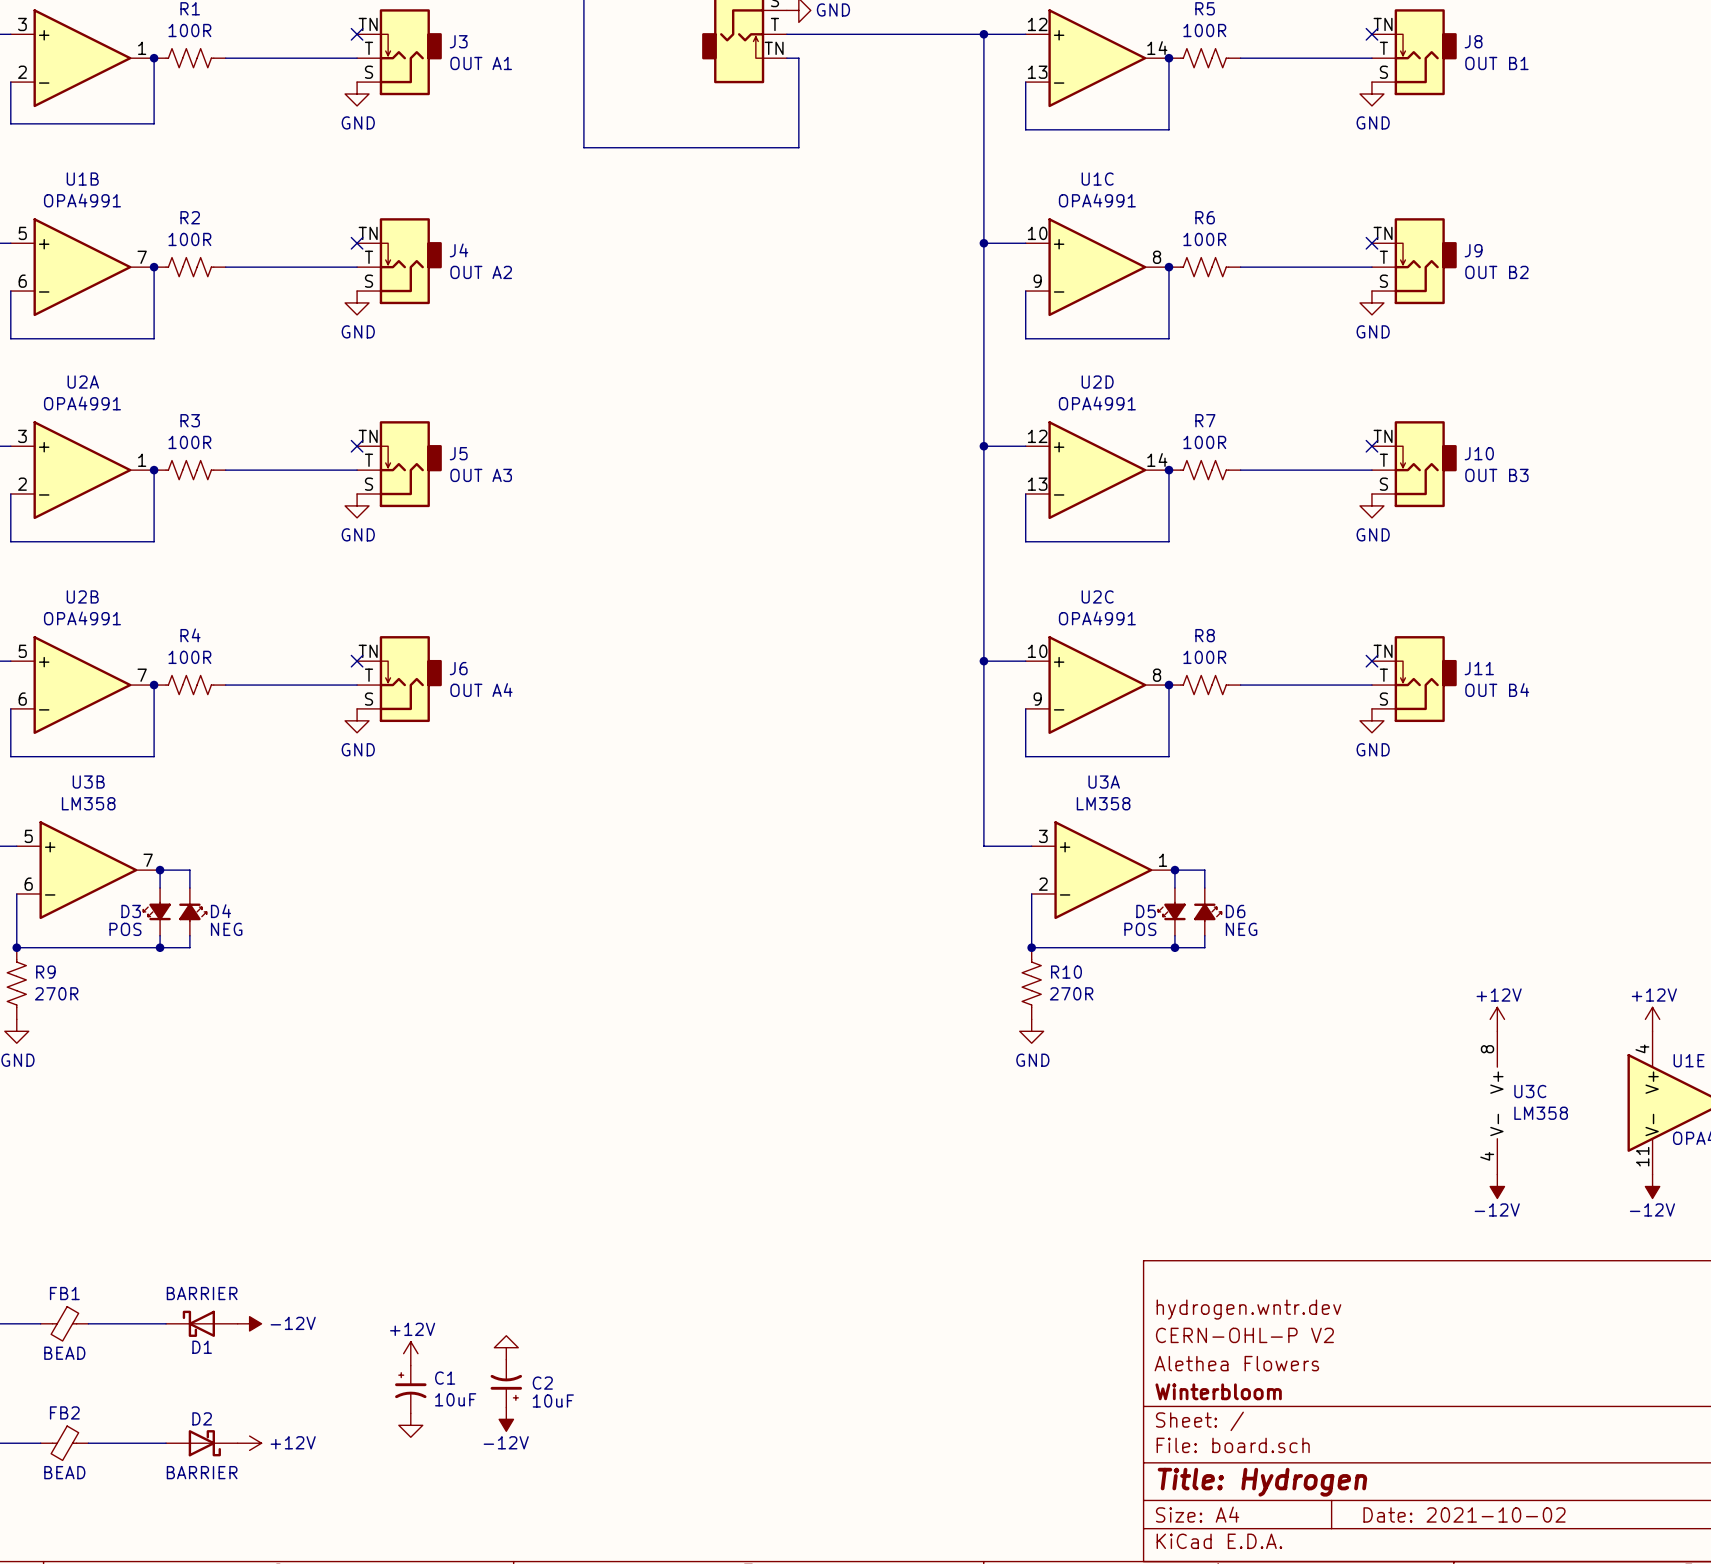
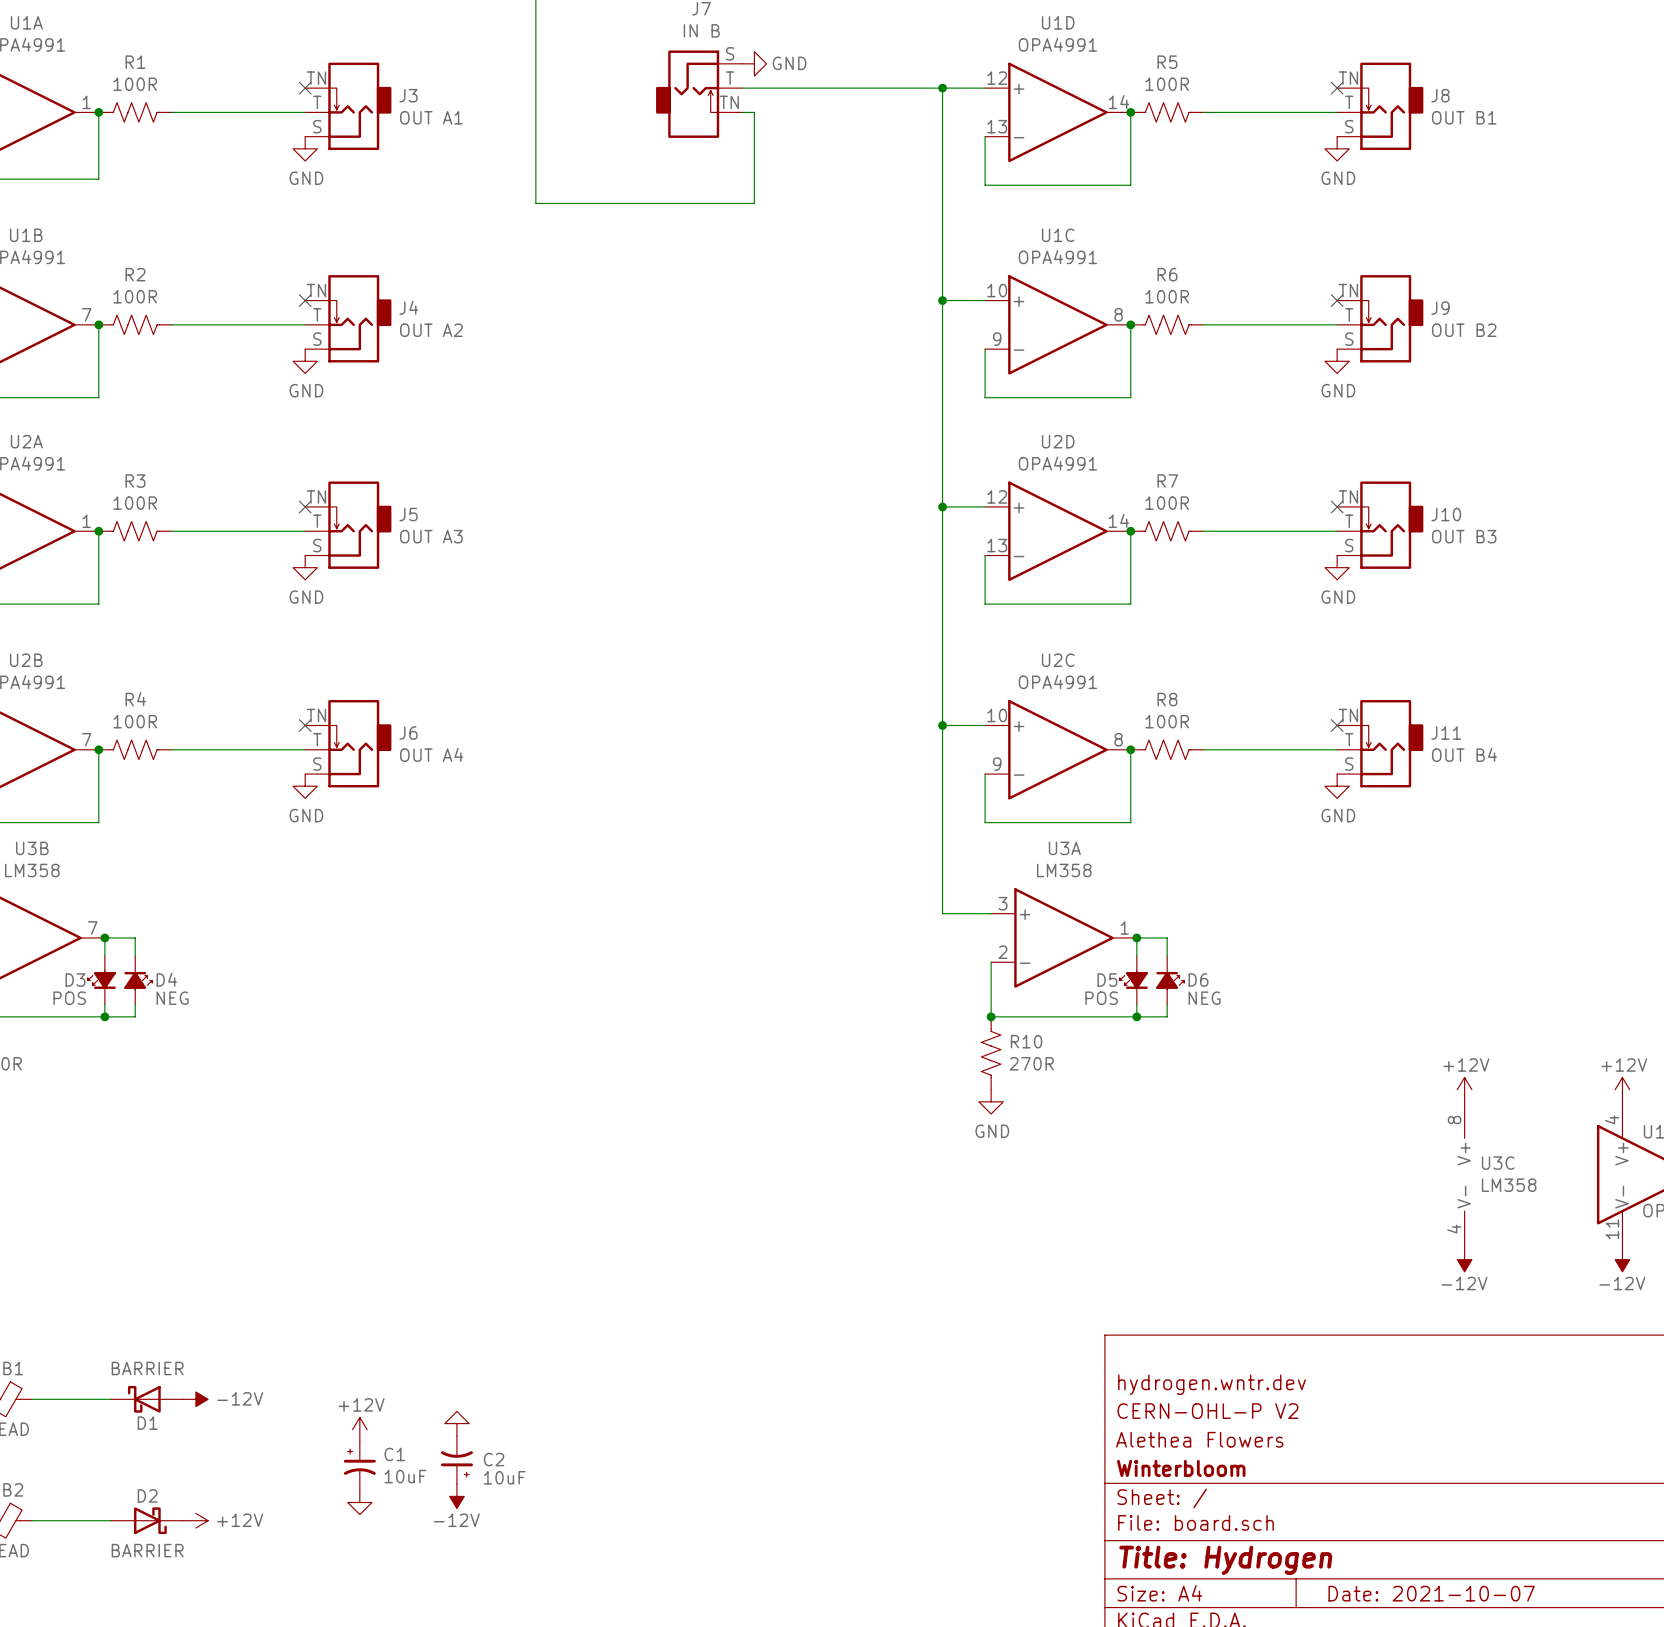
title block: Date: 2021-10-02 (1464, 1514) -> Date: 2021-10-07 (1431, 1593)

